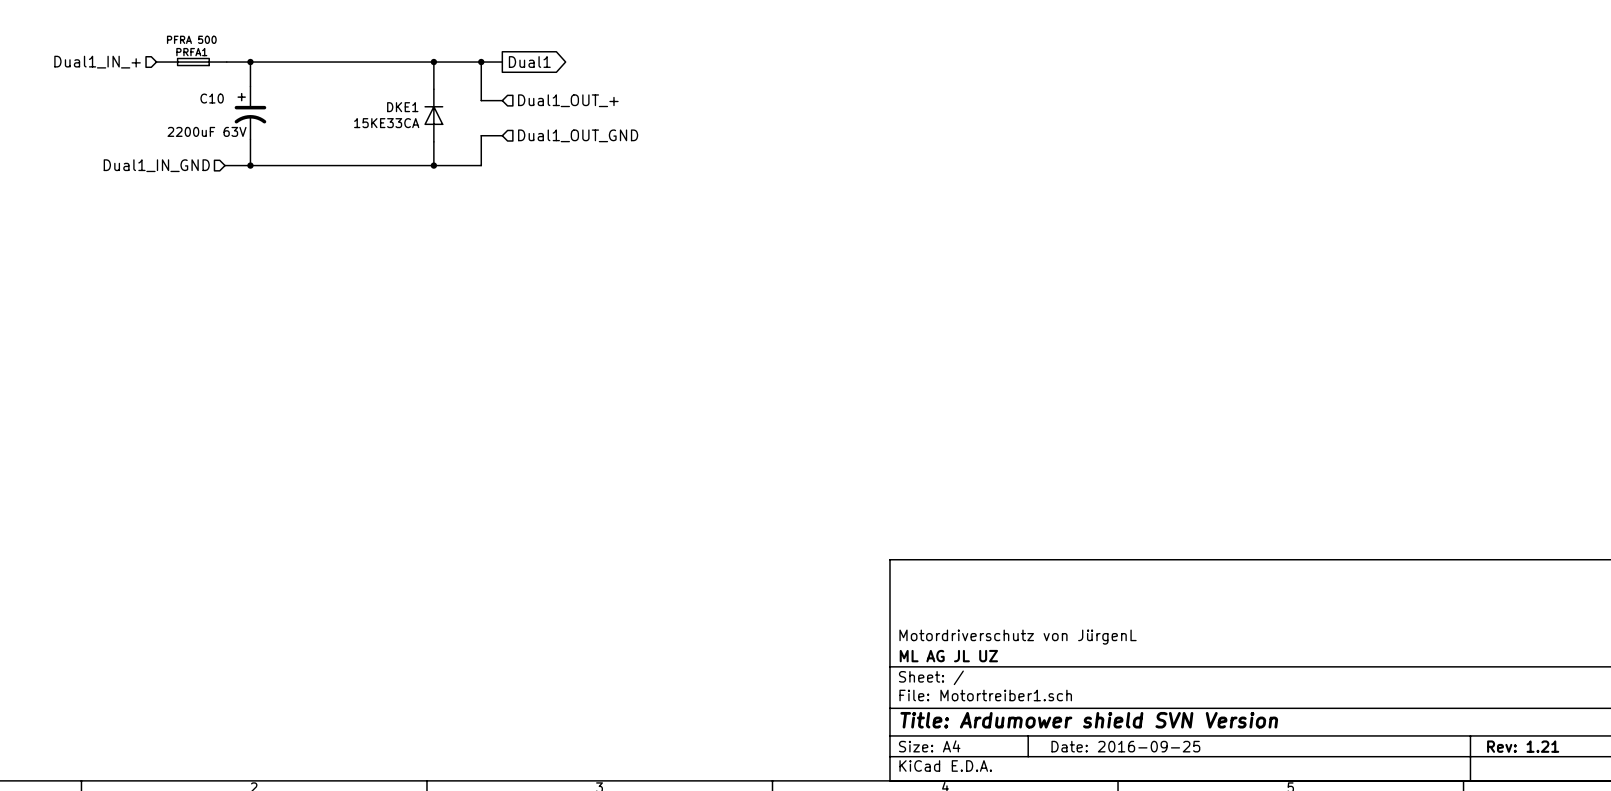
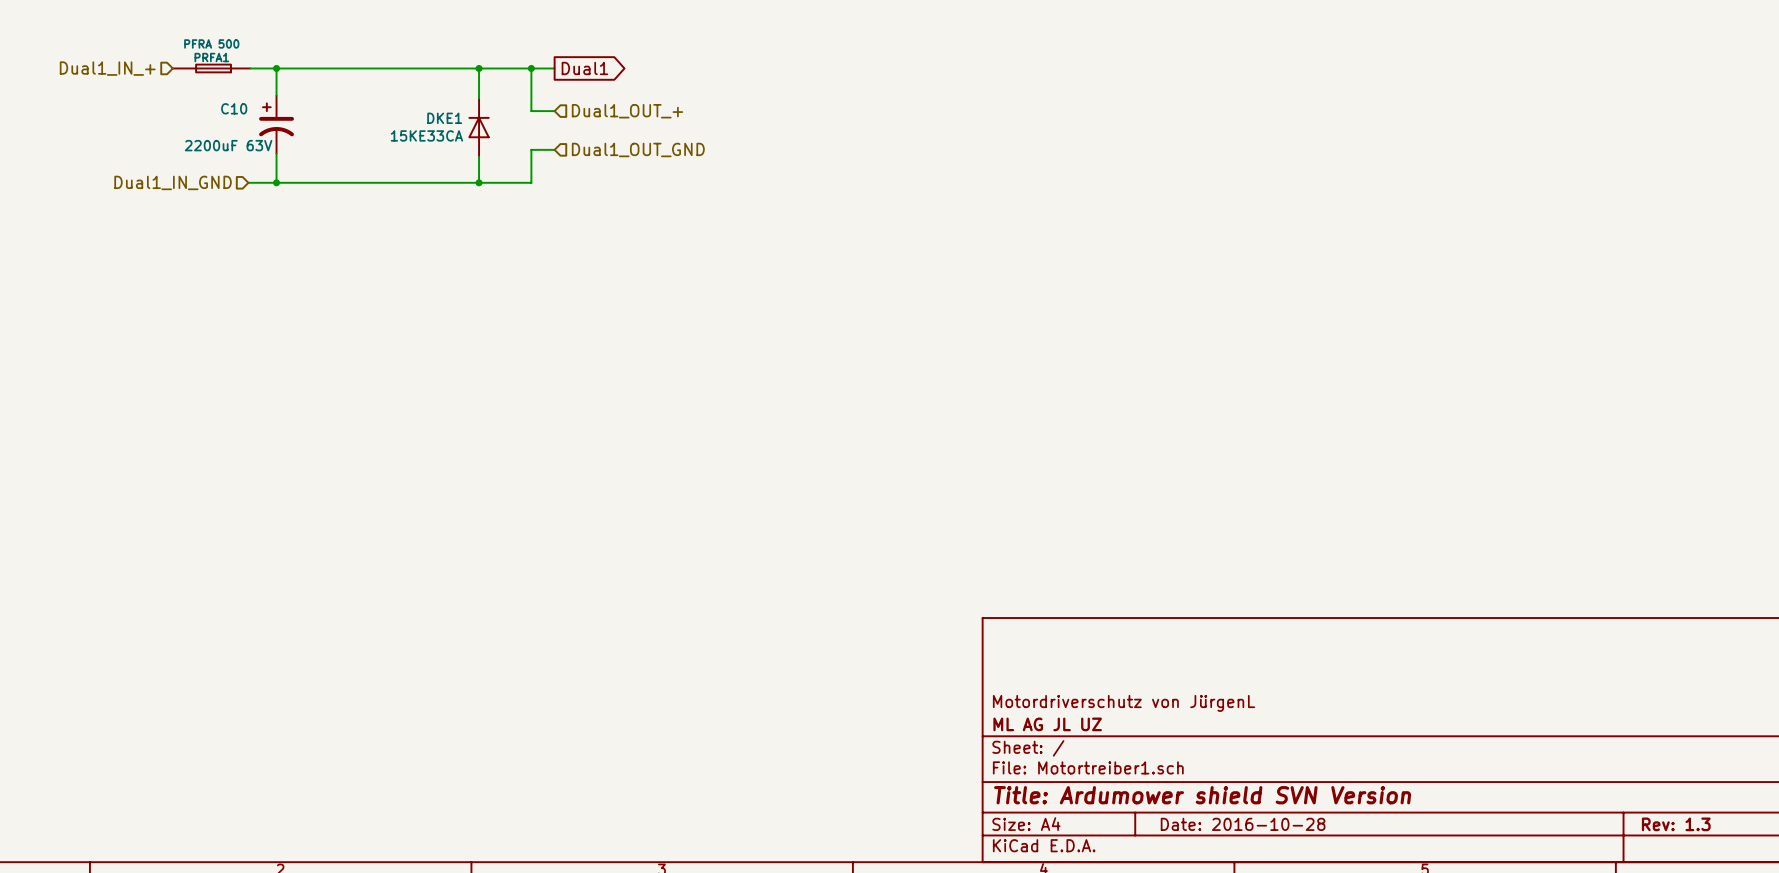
title block: Date: 2016-09-25 (1125, 746) -> Date: 2016-10-28 (1243, 824)
title block: Rev: 1.21 (1523, 746) -> Rev: 1.3 (1676, 824)

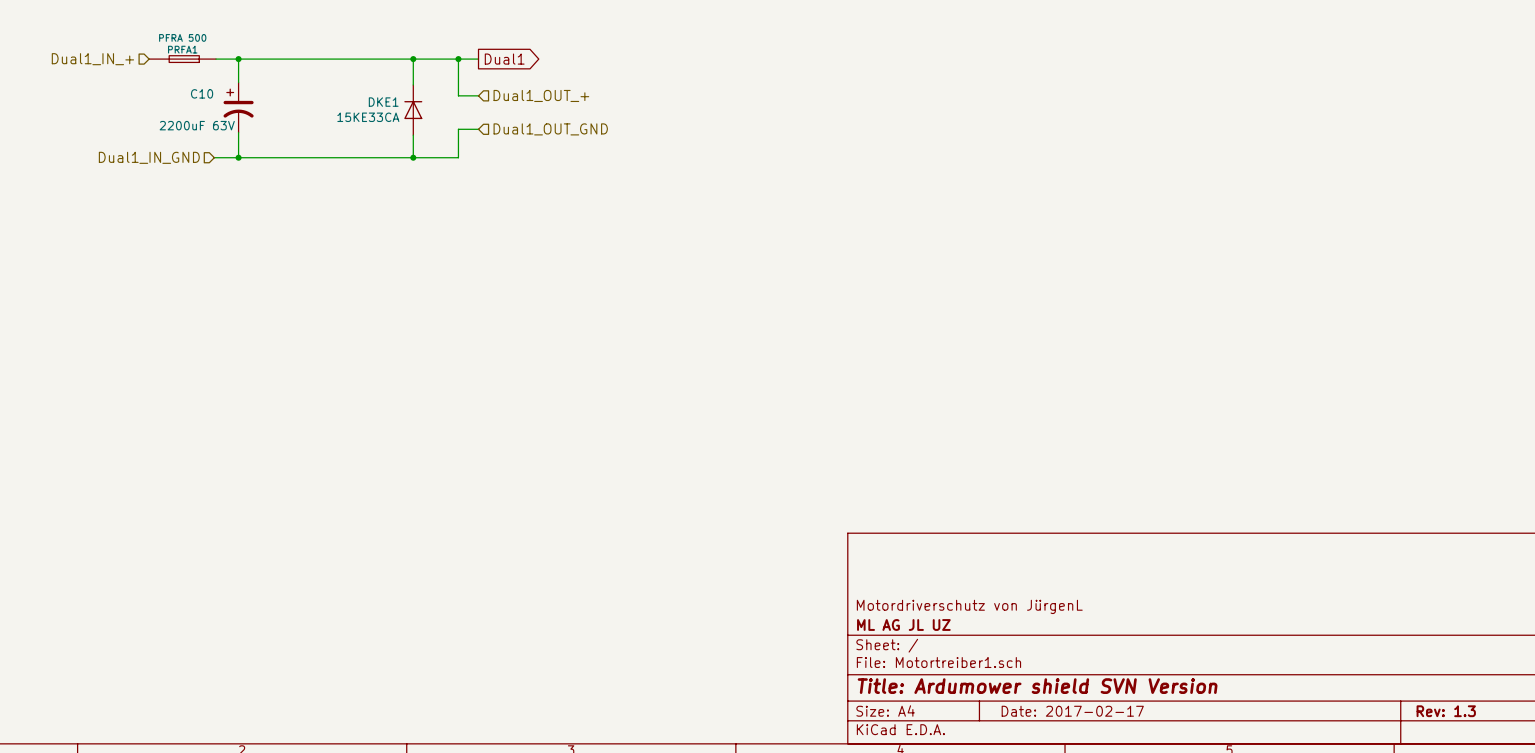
title block: Date: 2016-10-28 (1243, 824) -> Date: 2017-02-17 (1072, 711)

